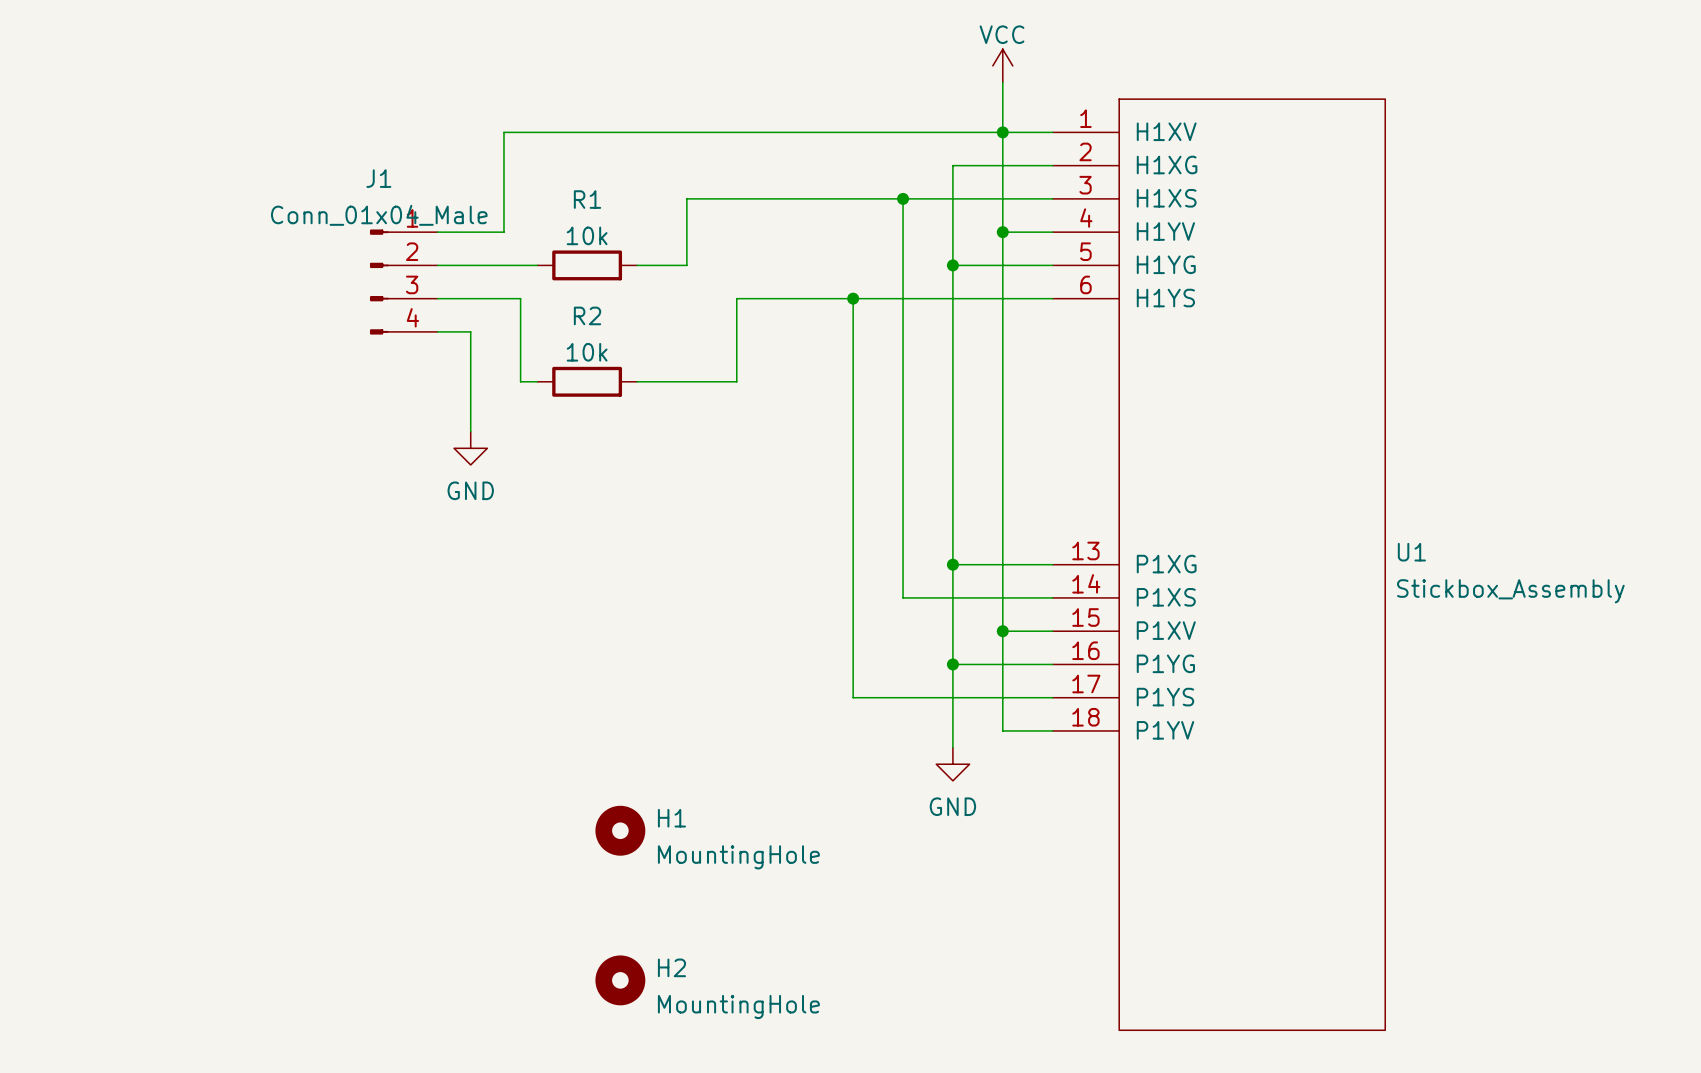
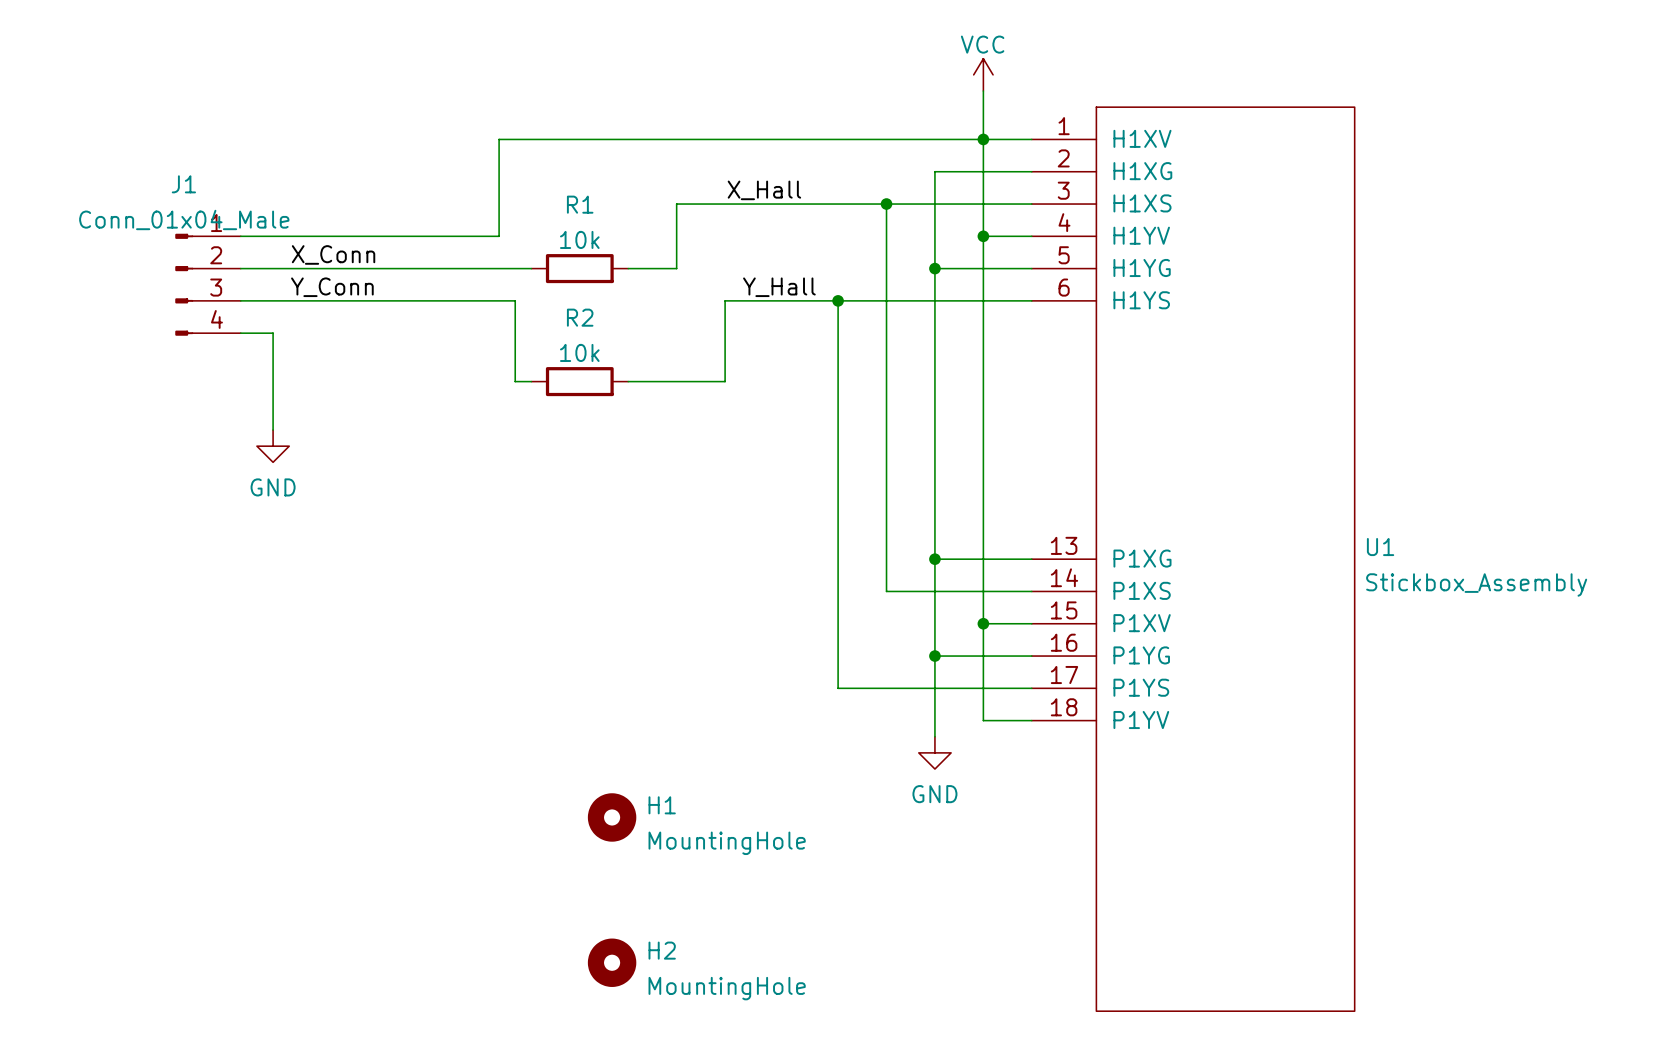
label: none -> X_Hall (764, 190)
wire: none -> (240, 236) (434, 236)
label: none -> X_Conn (333, 254)
wire: none -> (240, 268) (434, 268)
J1 position: (403, 282) -> (208, 284)
label: none -> Y_Conn (332, 287)
label: none -> Y_Hall (779, 287)
wire: none -> (240, 300) (434, 300)
wire: (437, 331) (470, 331) (470, 431) -> (240, 333) (273, 333) (273, 430)
power symbol position: GND (470, 448) -> GND (273, 446)

